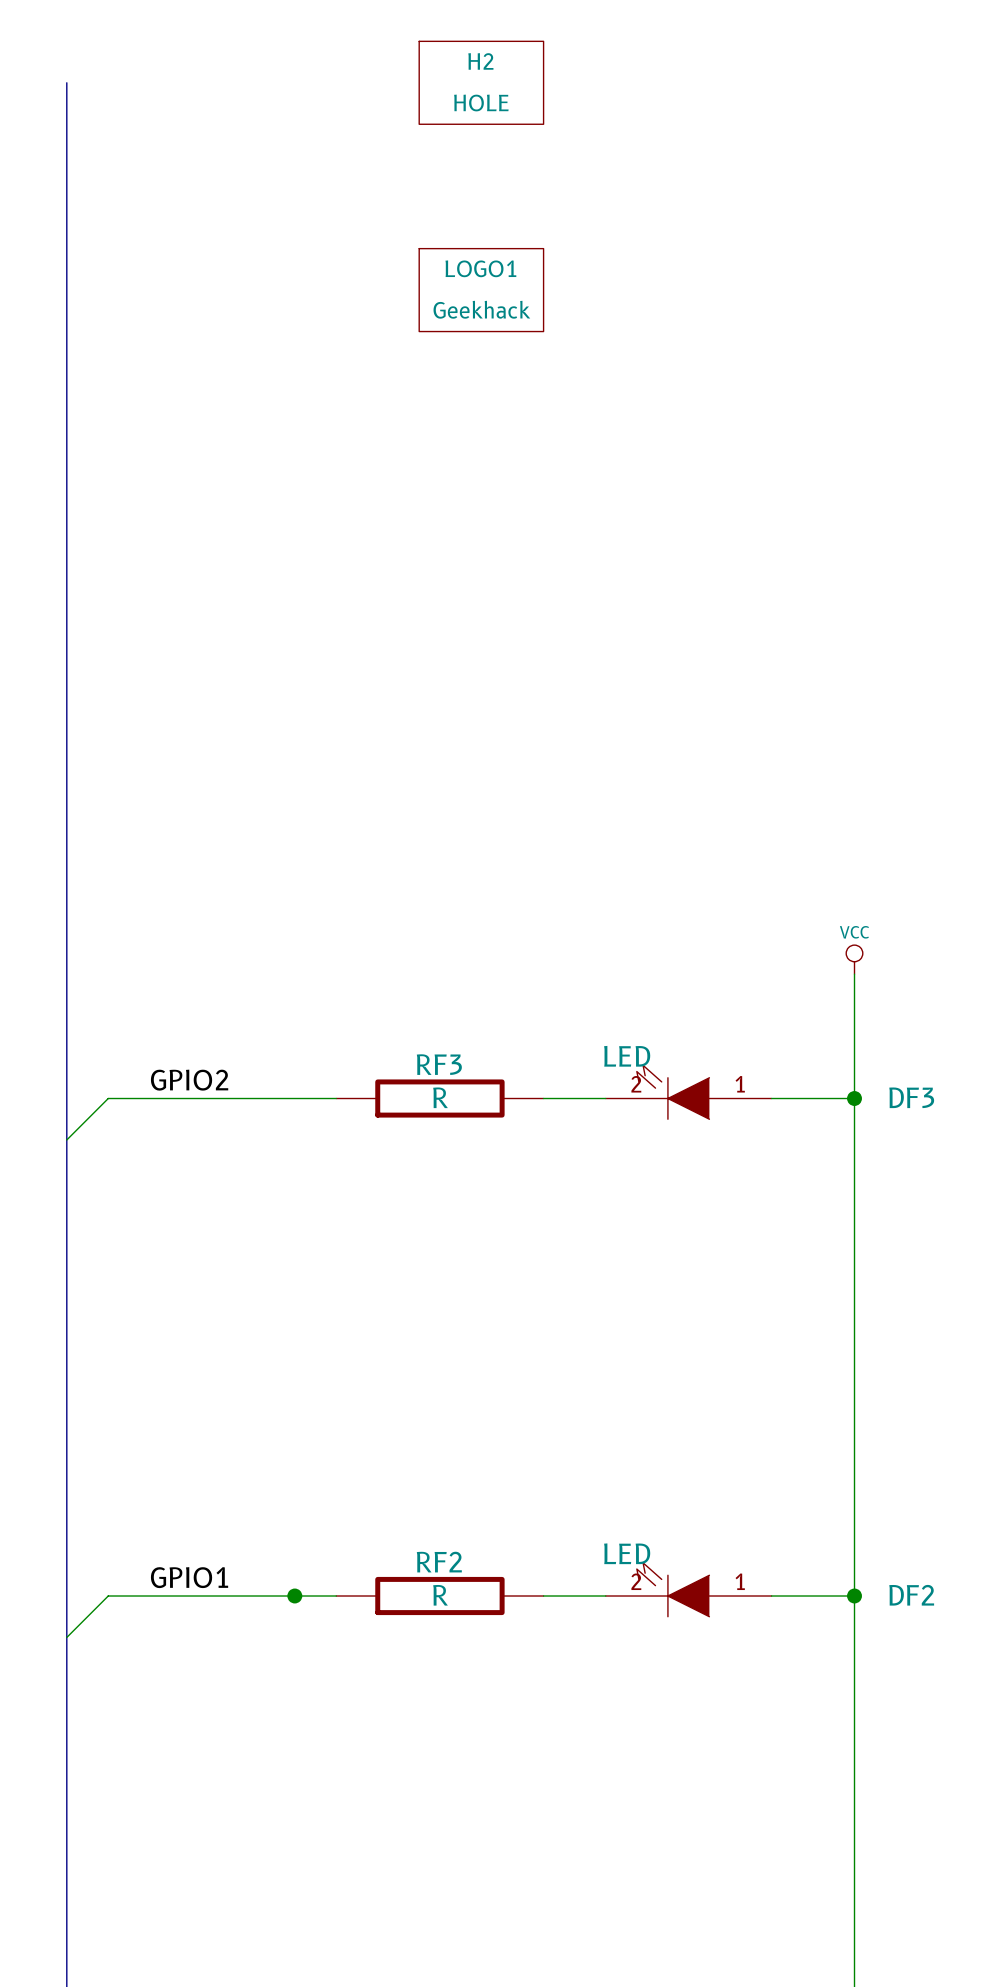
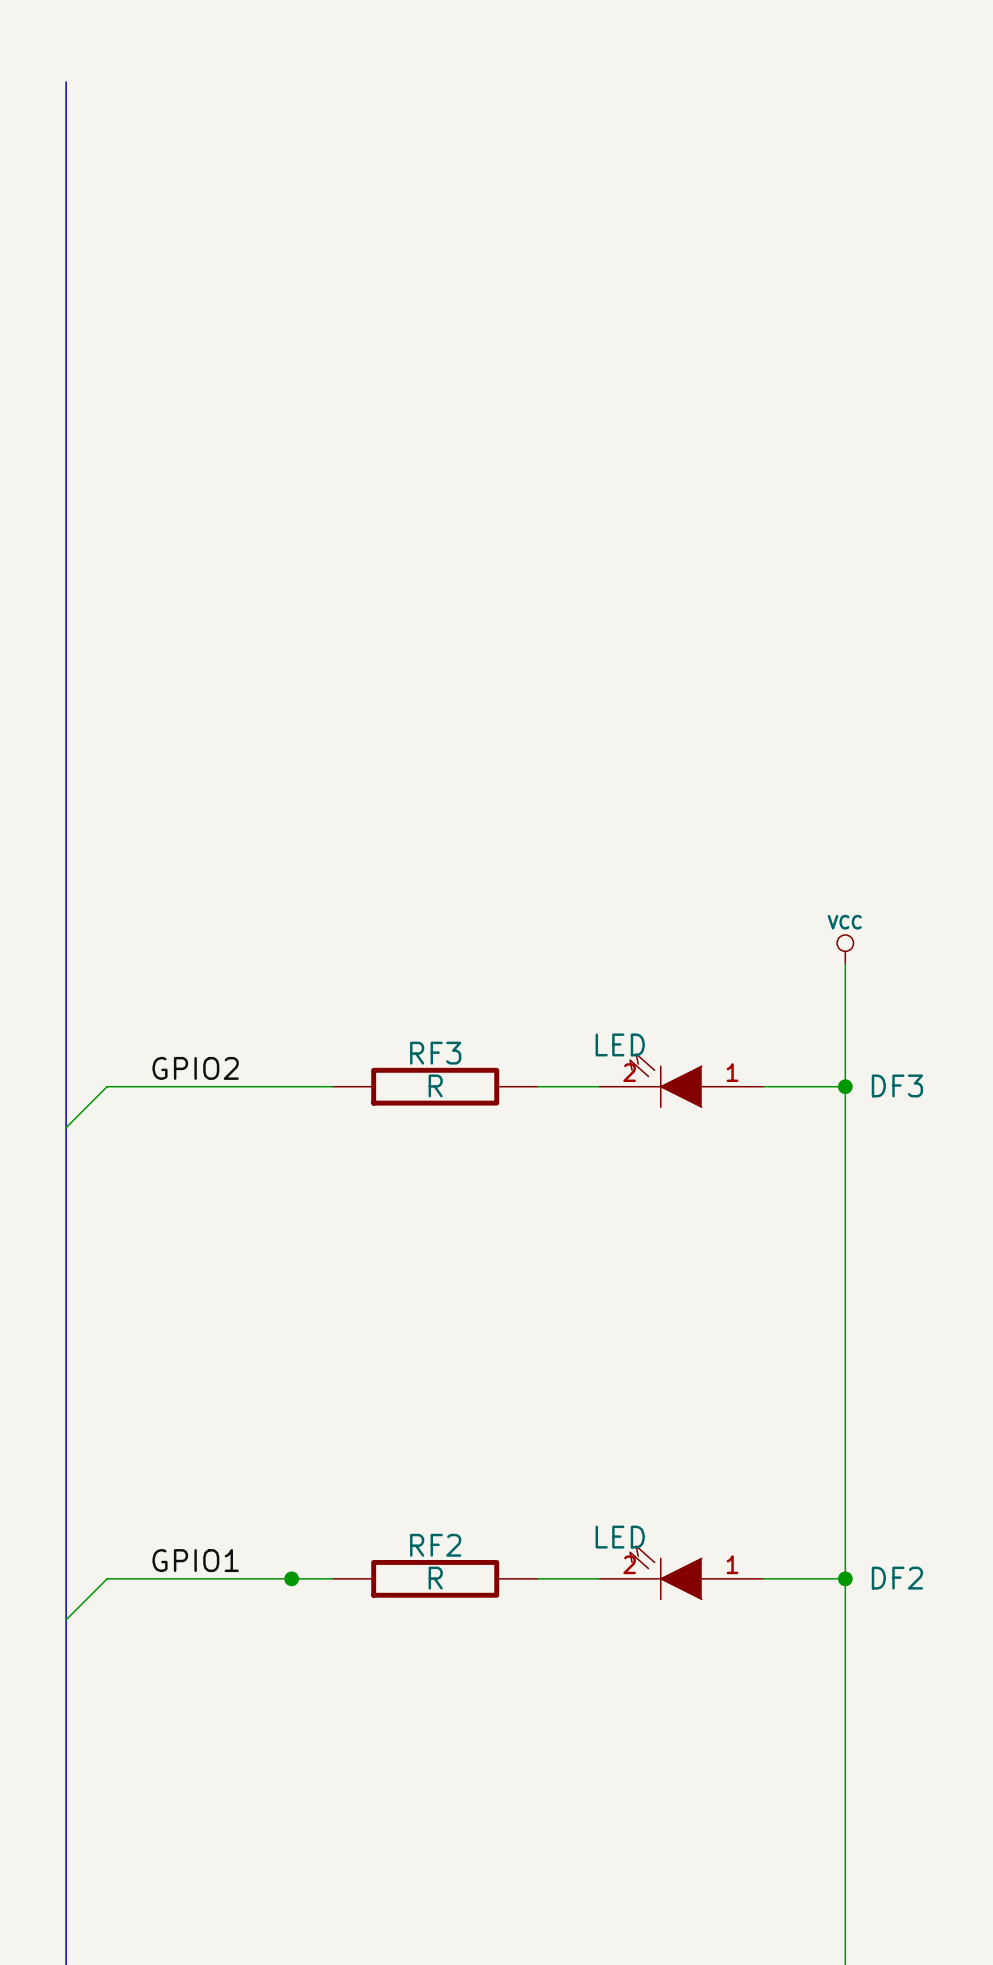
H2: HOLE (481, 82) -> none
LOGO1: Geekhack (481, 290) -> none

